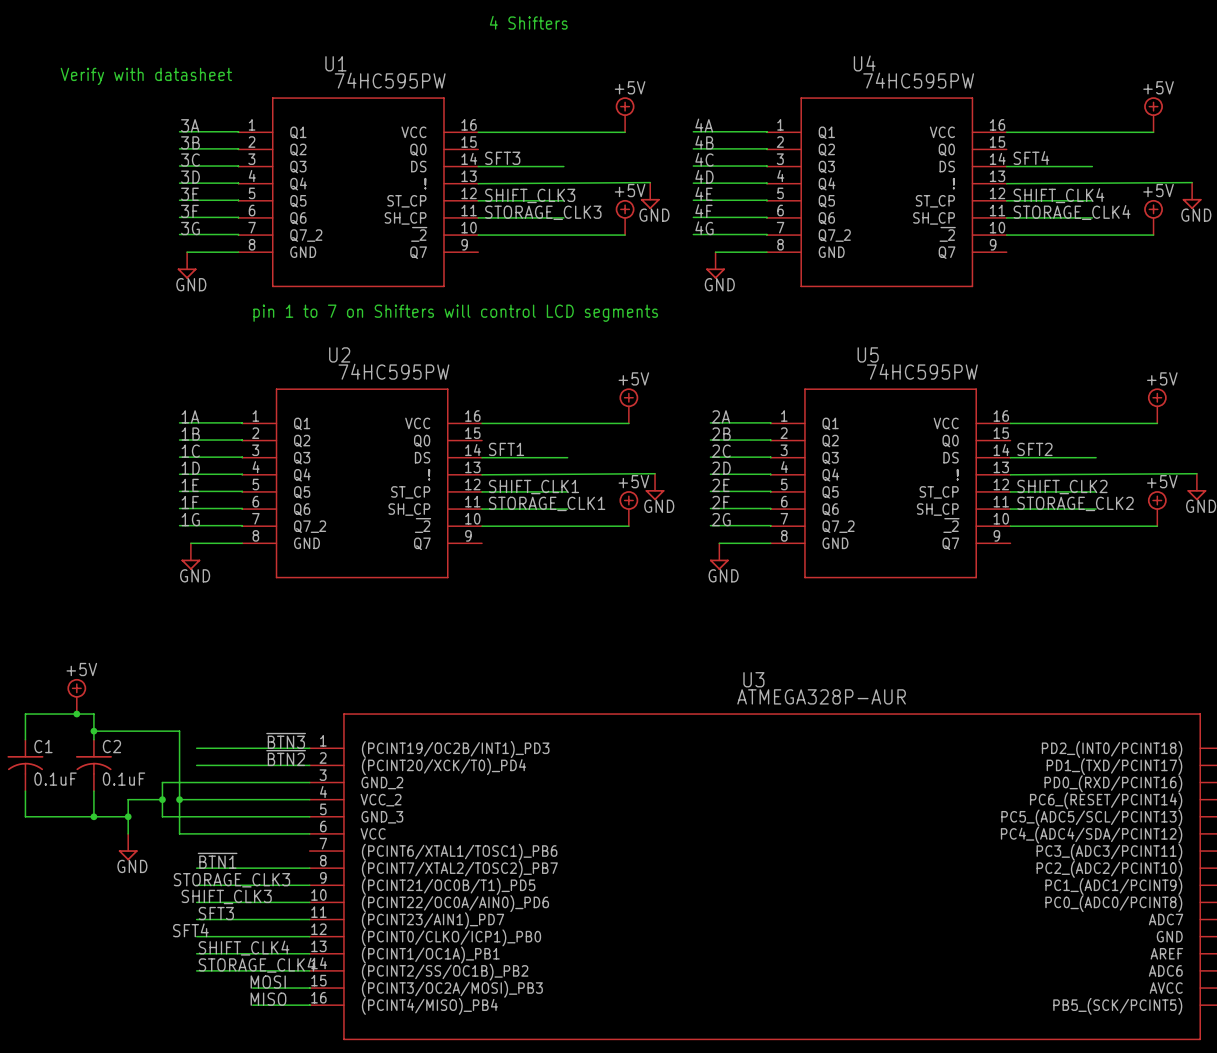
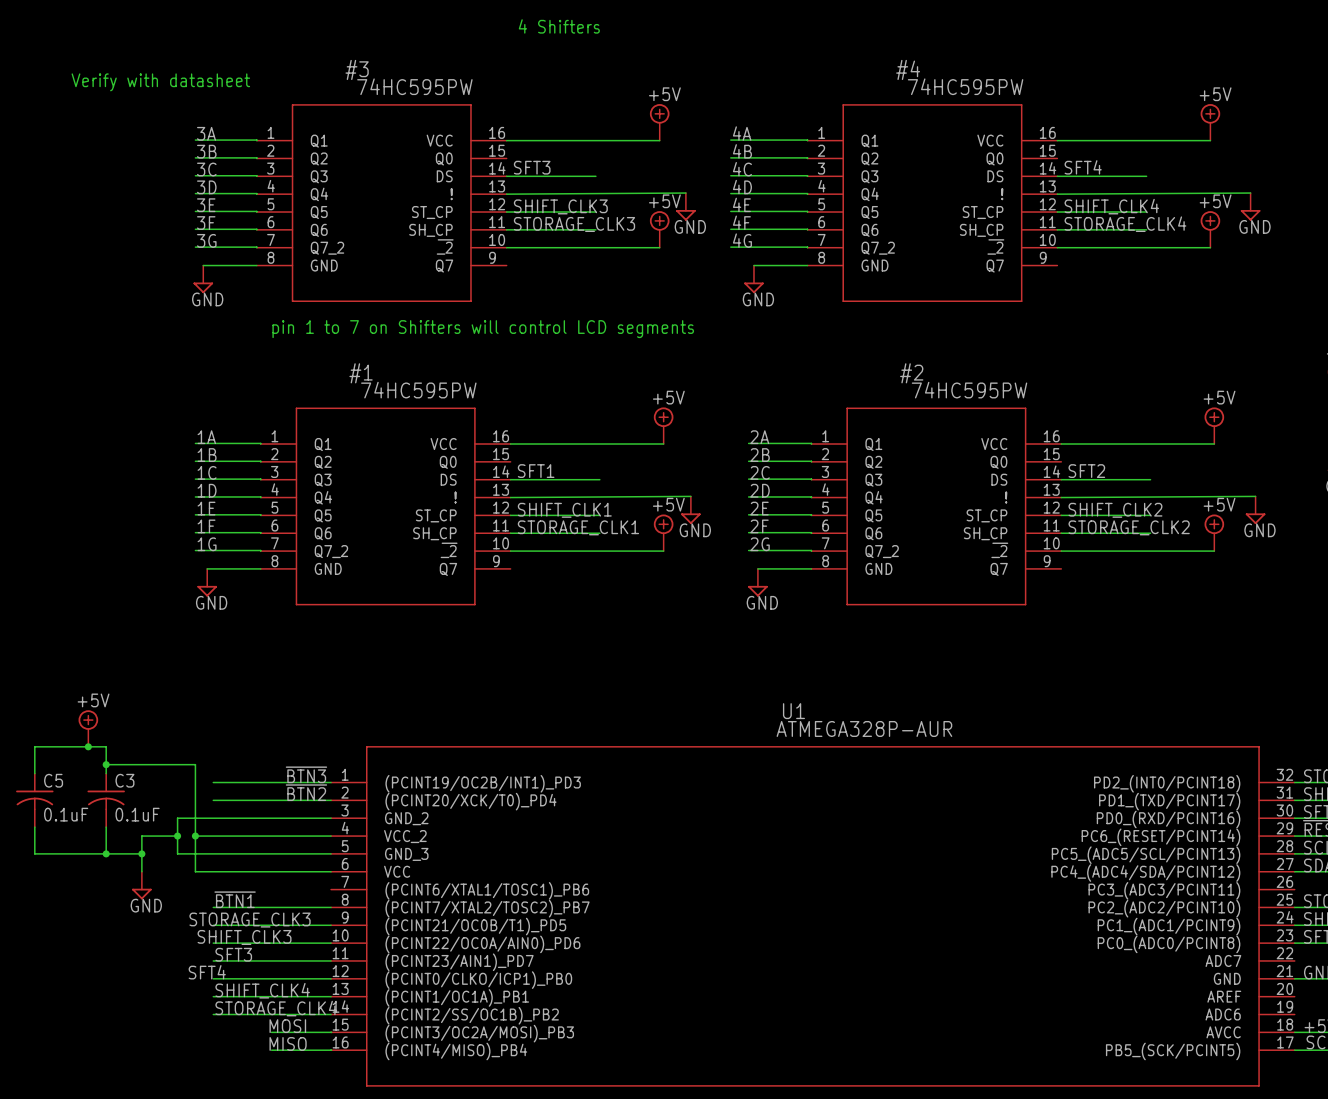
U1 name: U1 (335, 63) -> #3 (357, 69)
U4 name: U4 (864, 63) -> #4 (908, 69)
U2 name: U2 (339, 354) -> #1 (361, 373)
U5 name: U5 (868, 354) -> #2 (911, 373)
U3 name: U3 (753, 679) -> U1 (793, 711)
C1 name: C1 (43, 746) -> C5 (53, 780)
C2 name: C2 (111, 746) -> C3 (124, 780)

